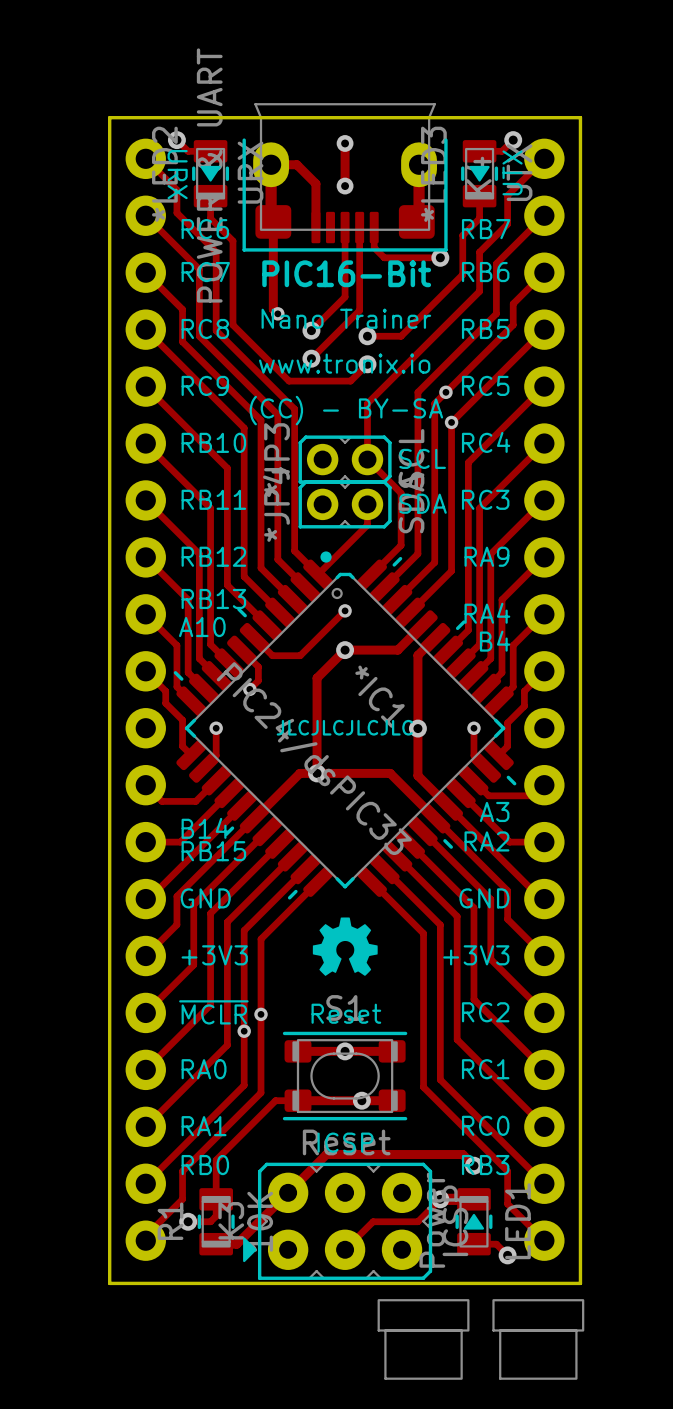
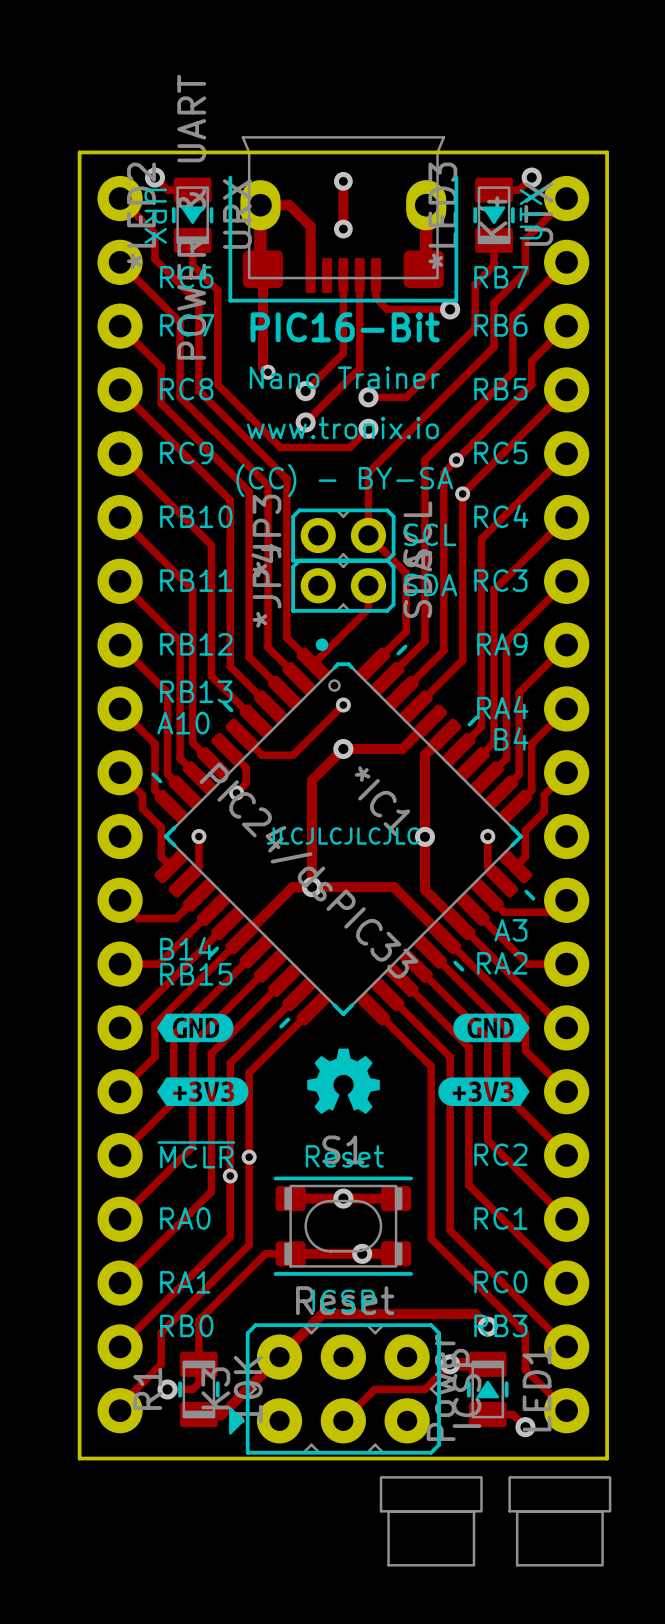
drawing: none -> [156, 1013, 234, 1043]
drawing: none -> [453, 1013, 530, 1043]
text: GND (205, 898) -> none
text: GND (484, 898) -> none
drawing: none -> [156, 1077, 249, 1107]
drawing: none -> [438, 1077, 530, 1107]
text: +3V3 (214, 955) -> none
text: +3V3 (476, 955) -> none

